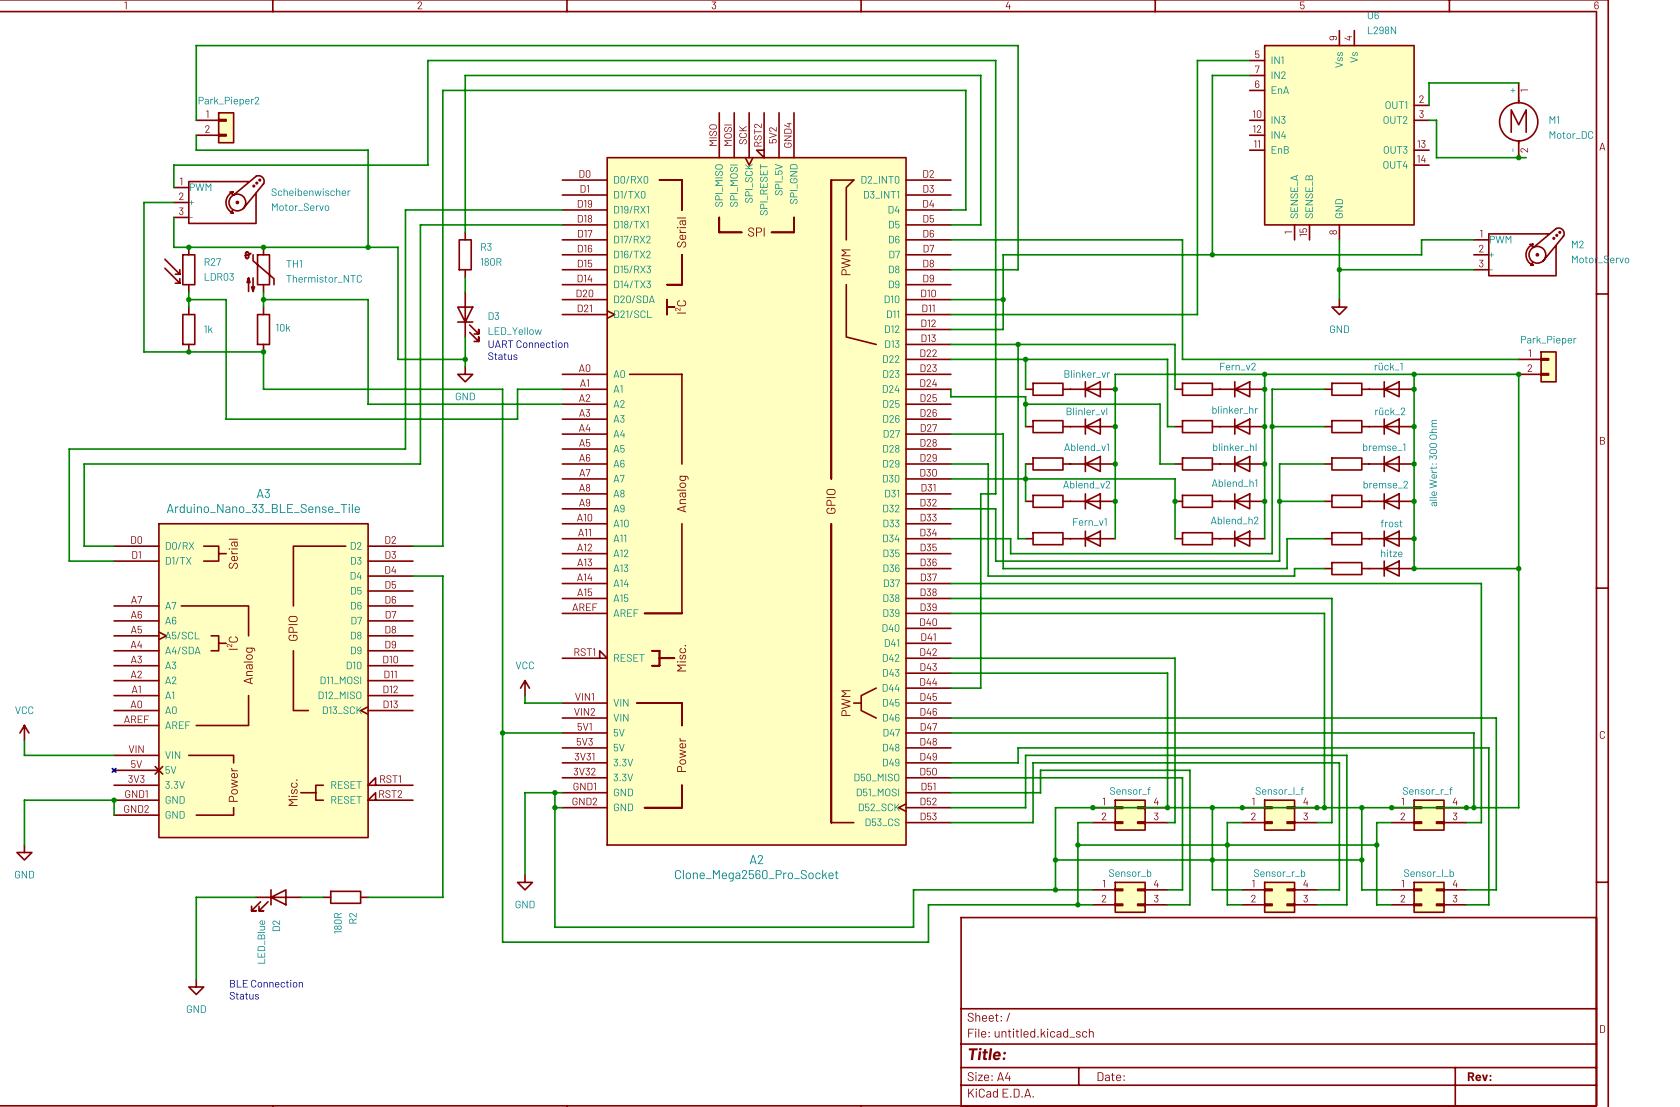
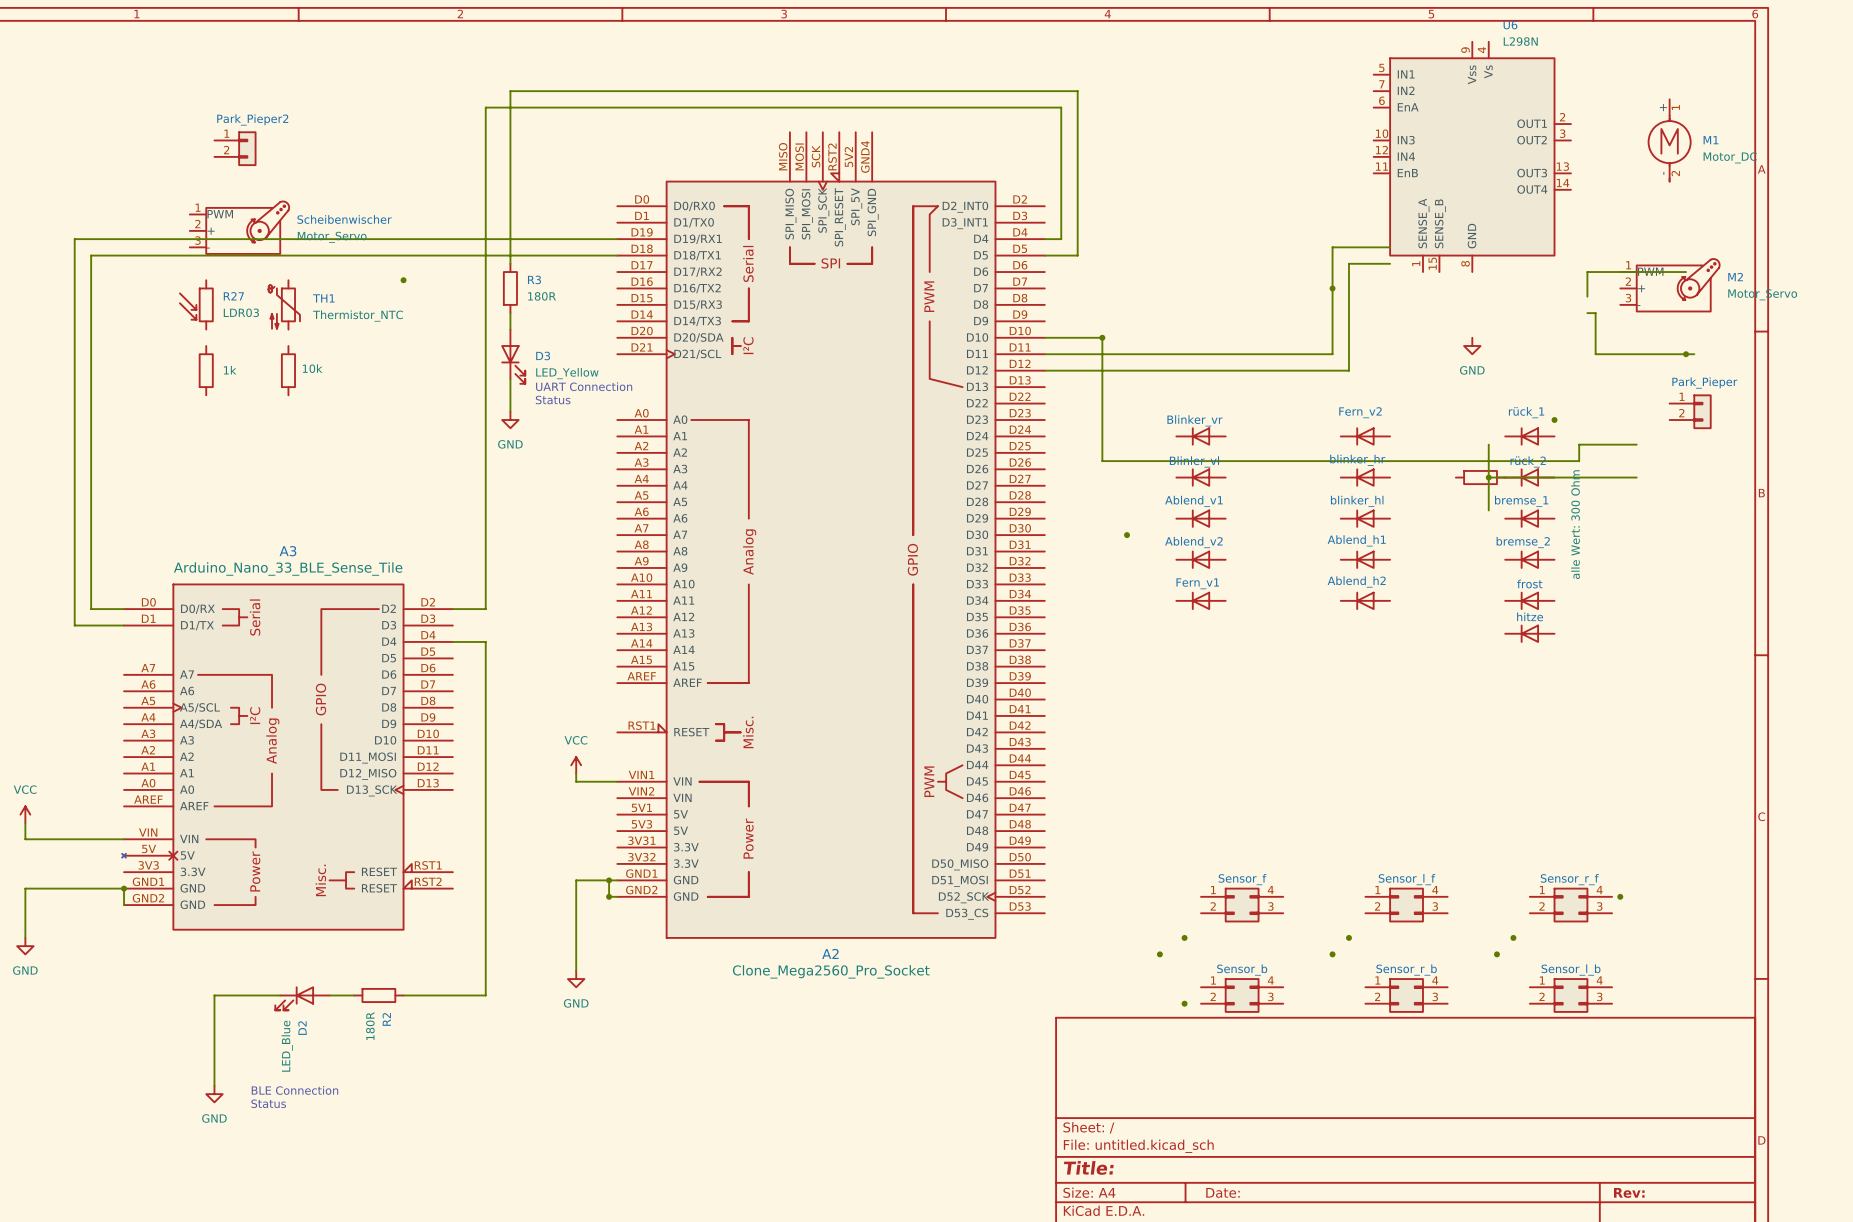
wire: (1249, 60) (1197, 60) (1197, 314) -> (1332, 288) (1332, 354) (1316, 354)
wire: (1249, 75) (1212, 75) (1212, 217) -> (1390, 247) (1332, 247)
wire: (1518, 82) (1429, 82) (1429, 105) -> none
wire: (196, 120) (196, 45) (1018, 45) (1018, 269) (950, 269) -> none
wire: (1429, 120) (1436, 120) (1436, 157) (1526, 157) -> none
wire: (196, 135) (196, 150) (368, 150) (368, 247) -> none
junction: (1518, 157) -> none
wire: (173, 187) (173, 165) (427, 165) (427, 60) (995, 60) (995, 493) (980, 493) (980, 688) (950, 688) -> none
wire: (173, 202) (143, 202) (143, 351) (263, 351) (263, 389) (502, 389) (502, 942) (928, 942) (928, 904) (1092, 904) -> none
wire: (405, 209) (405, 449) (69, 449) -> (444, 239) (74, 239) (74, 502)
wire: (173, 217) (173, 247) (397, 247) (397, 359) (465, 359) -> none
wire: (420, 224) (420, 463) (84, 463) -> (461, 255) (91, 255) (91, 518)
wire: none -> (1390, 263) (1348, 263) (1348, 370) (1102, 370) (1102, 461) (1579, 461) (1579, 444) (1636, 444)
wire: (950, 239) (1182, 239) (1182, 359) (1518, 359) -> none
wire: (1339, 239) (1339, 299) -> none
wire: (1443, 239) (1421, 239) (1421, 254) (1003, 254) (1003, 299) -> (1587, 272) (1587, 296)
wire: none -> (1620, 272) (1686, 272)
junction: (188, 247) -> none
junction: (263, 247) -> none
wire: (1339, 269) (1473, 269) -> none
junction: (1339, 269) -> none
wire: none -> (1587, 313) (1595, 313) (1595, 354) (1694, 354)
wire: (188, 292) (188, 307) -> none
wire: (263, 292) (263, 307) -> none
wire: (188, 299) (226, 299) (226, 419) (517, 419) (517, 389) (562, 389) -> none
junction: (188, 299) -> none
wire: (263, 299) (368, 299) (368, 404) (562, 404) -> none
junction: (263, 299) -> none
junction: none -> (1686, 354)
wire: (950, 344) (1175, 344) (1175, 389) -> none
wire: (1018, 344) (1018, 538) (1025, 538) -> none
junction: (1018, 344) -> none
junction: (188, 351) -> none
junction: (263, 351) -> none
junction: (465, 359) -> none
wire: (950, 359) (1167, 359) (1167, 426) (1175, 426) -> none
wire: (1025, 359) (1025, 389) -> none
junction: (1025, 359) -> none
wire: (1264, 374) (1264, 538) -> none
junction: (1264, 374) -> none
wire: (1414, 374) (1414, 568) (1518, 568) -> none
junction: (1518, 374) -> none
wire: (950, 389) (950, 396) (1025, 396) (1025, 426) -> none
part: (1048, 389) -> none
junction: (1115, 389) -> none
part: (1197, 389) -> none
junction: (1264, 389) -> none
wire: (1324, 389) (1272, 389) (1272, 553) (1010, 553) (1010, 538) (950, 538) -> none
part: (1346, 389) -> none
junction: (1414, 389) -> none
wire: none -> (1488, 444) (1488, 510)
wire: (1025, 404) (1160, 404) (1160, 463) (1175, 463) -> none
junction: (1025, 404) -> none
part: (1048, 426) -> none
junction: (1115, 426) -> none
part: (1197, 426) -> none
junction: (1264, 426) -> none
wire: (1272, 426) (1324, 426) -> none
junction: (1272, 426) -> none
wire: none -> (1488, 477) (1636, 477)
junction: none -> (1488, 477)
junction: (1414, 426) -> none
wire: (950, 434) (1003, 434) (1003, 568) (1287, 568) (1287, 538) (1324, 538) -> none
wire: (950, 463) (988, 463) (988, 576) (1294, 576) (1294, 568) (1324, 568) -> none
wire: (1025, 463) (1025, 501) -> none
part: (1048, 463) -> none
junction: (1115, 463) -> none
part: (1197, 463) -> none
junction: (1264, 463) -> none
wire: (1324, 463) (1279, 463) (1279, 561) (995, 561) (995, 508) (950, 508) -> none
part: (1346, 463) -> none
junction: (1414, 463) -> none
wire: (950, 478) (1175, 478) (1175, 538) -> none
part: (1048, 501) -> none
junction: (1115, 501) -> none
junction: (1175, 501) -> none
part: (1197, 501) -> none
junction: (1264, 501) -> none
wire: (1279, 501) (1324, 501) -> none
junction: (1279, 501) -> none
part: (1346, 501) -> none
junction: (1414, 501) -> none
part: (1048, 538) -> none
wire: (1115, 538) (1115, 374) (1518, 374) (1518, 807) (1055, 807) (1055, 889) -> none
part: (1197, 538) -> none
part: (1346, 538) -> none
junction: (1414, 538) -> none
part: (1346, 568) -> none
junction: (1414, 568) -> none
junction: (1518, 568) -> none
wire: (950, 583) (1481, 583) (1481, 822) (1466, 822) -> none
wire: (950, 598) (1331, 598) (1331, 822) (1316, 822) -> none
wire: (950, 613) (1324, 613) (1324, 807) -> none
wire: (950, 658) (1175, 658) (1175, 822) (1167, 822) -> none
wire: (950, 673) (1167, 673) (1167, 807) -> none
wire: (950, 718) (1496, 718) (1496, 889) (1466, 889) -> none
wire: (502, 732) (562, 732) -> none
junction: (502, 732) -> none
wire: (950, 732) (1473, 732) (1473, 807) -> none
wire: (950, 762) (1018, 762) (1018, 747) (1488, 747) (1488, 904) (1466, 904) -> none
wire: (950, 777) (1182, 777) (1182, 889) (1167, 889) -> none
wire: (950, 792) (1040, 792) (1040, 770) (1189, 770) (1189, 904) (1167, 904) -> none
wire: (554, 807) (554, 927) (913, 927) (913, 889) (1092, 889) -> none
wire: (950, 807) (1025, 807) (1025, 755) (1346, 755) (1346, 904) (1316, 904) -> none
junction: (1092, 807) -> none
junction: (1167, 807) -> none
wire: (1212, 807) (1212, 889) (1242, 889) -> none
junction: (1212, 807) -> none
junction: (1242, 807) -> none
junction: (1316, 807) -> none
junction: (1324, 807) -> none
wire: (1361, 807) (1361, 889) (1391, 889) -> none
junction: (1361, 807) -> none
junction: (1391, 807) -> none
junction: (1466, 807) -> none
wire: (950, 822) (1033, 822) (1033, 762) (1339, 762) (1339, 889) (1316, 889) -> none
wire: (1092, 822) (1077, 822) (1077, 904) -> none
wire: (1242, 822) (1227, 822) (1227, 904) (1242, 904) -> none
wire: (1391, 822) (1376, 822) (1376, 904) (1391, 904) -> none
wire: (1077, 845) (1376, 845) -> none
wire: (1055, 859) (1361, 859) -> none
junction: (1055, 889) -> none

